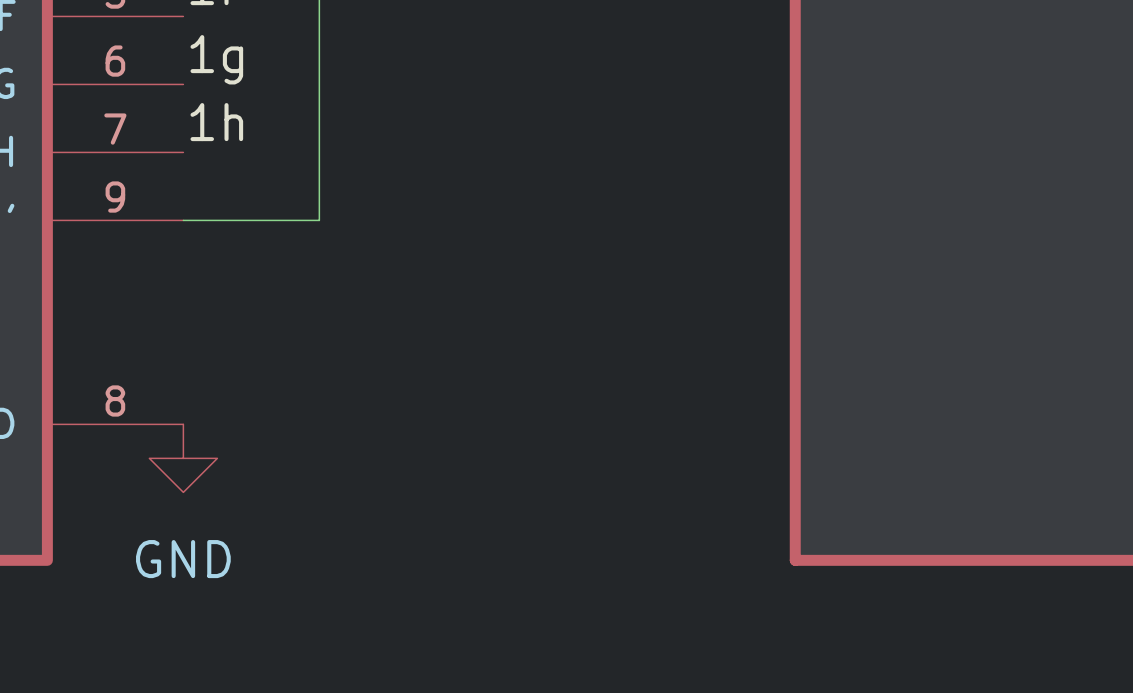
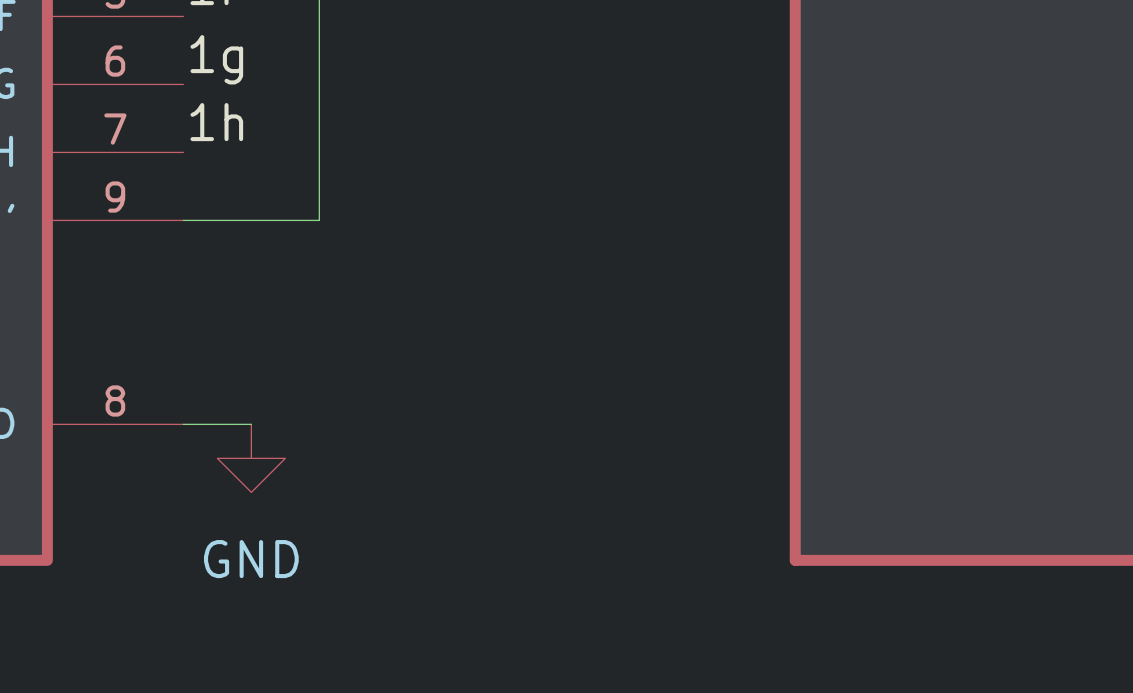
wire: none -> (183, 424) (251, 424)
power symbol position: GND (183, 458) -> GND (251, 458)

